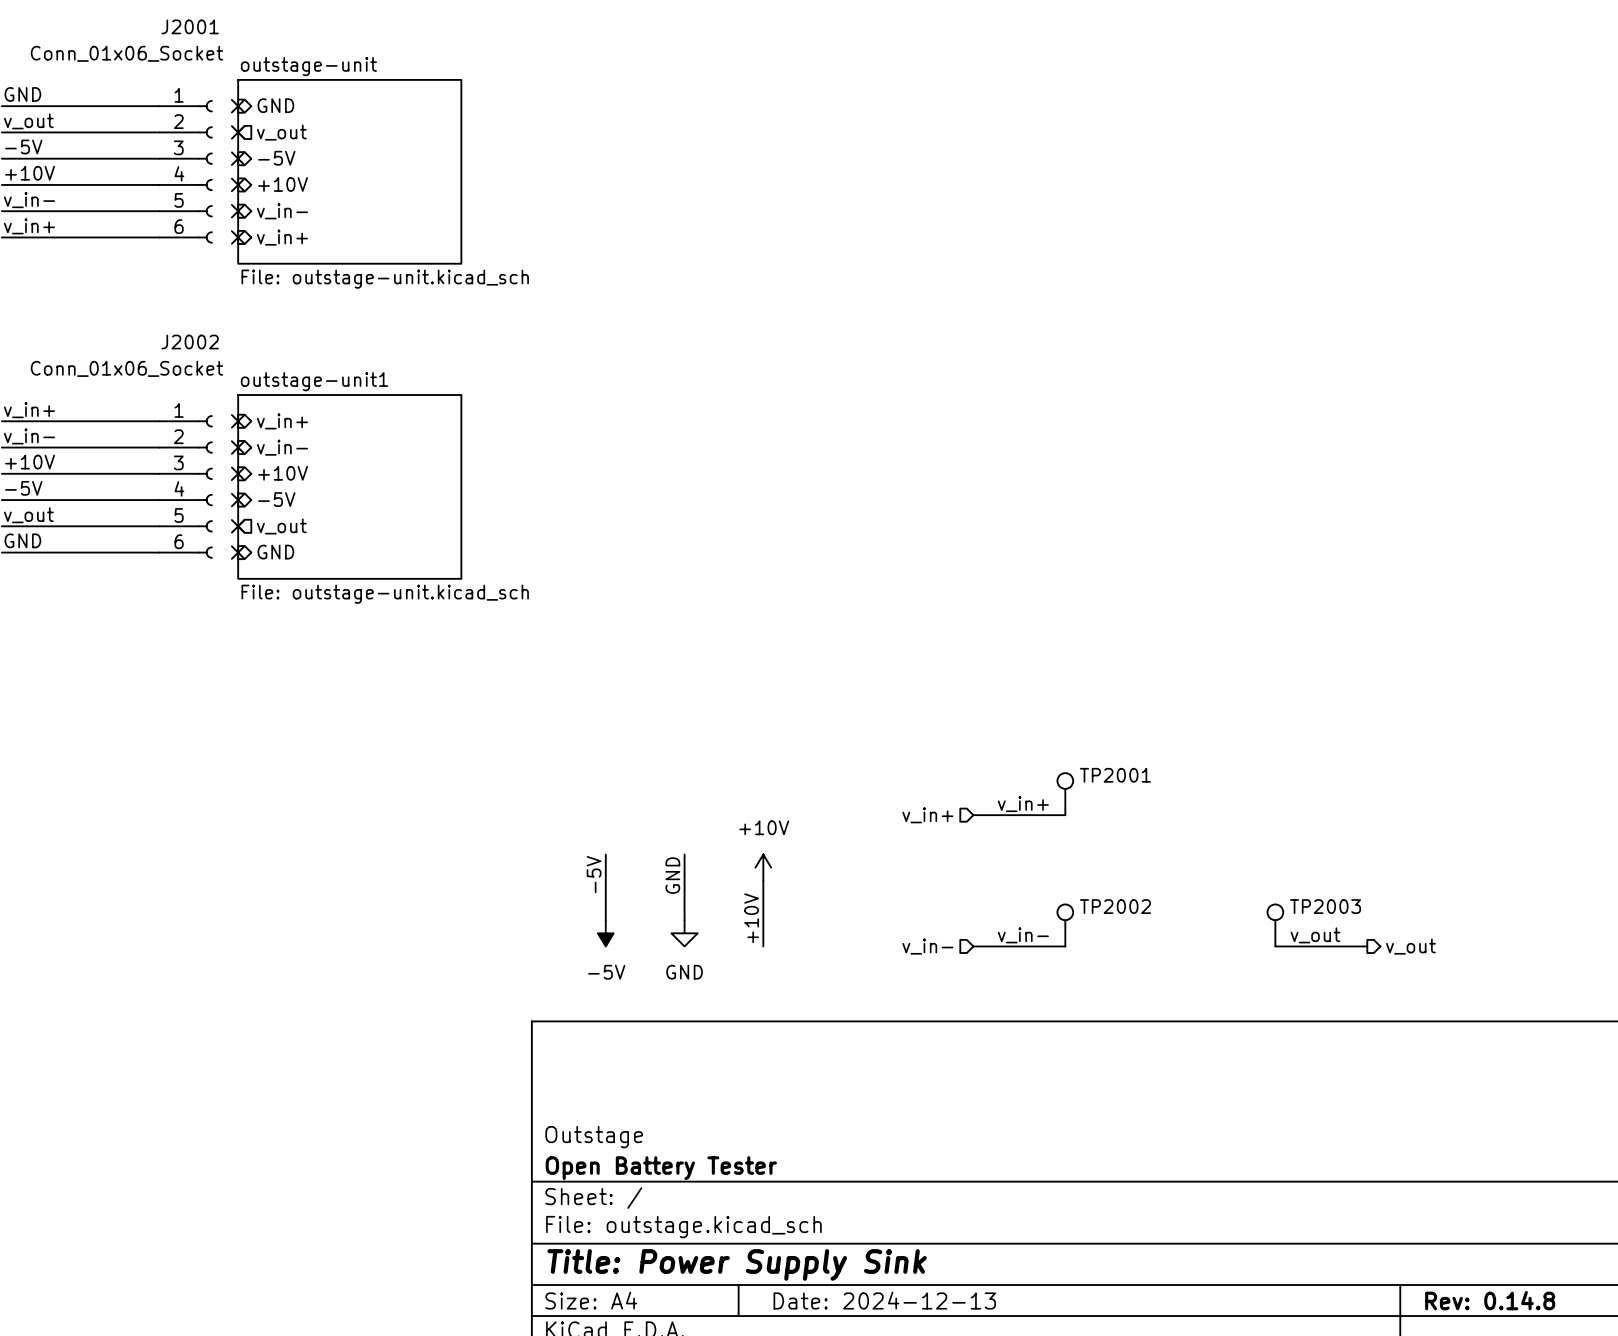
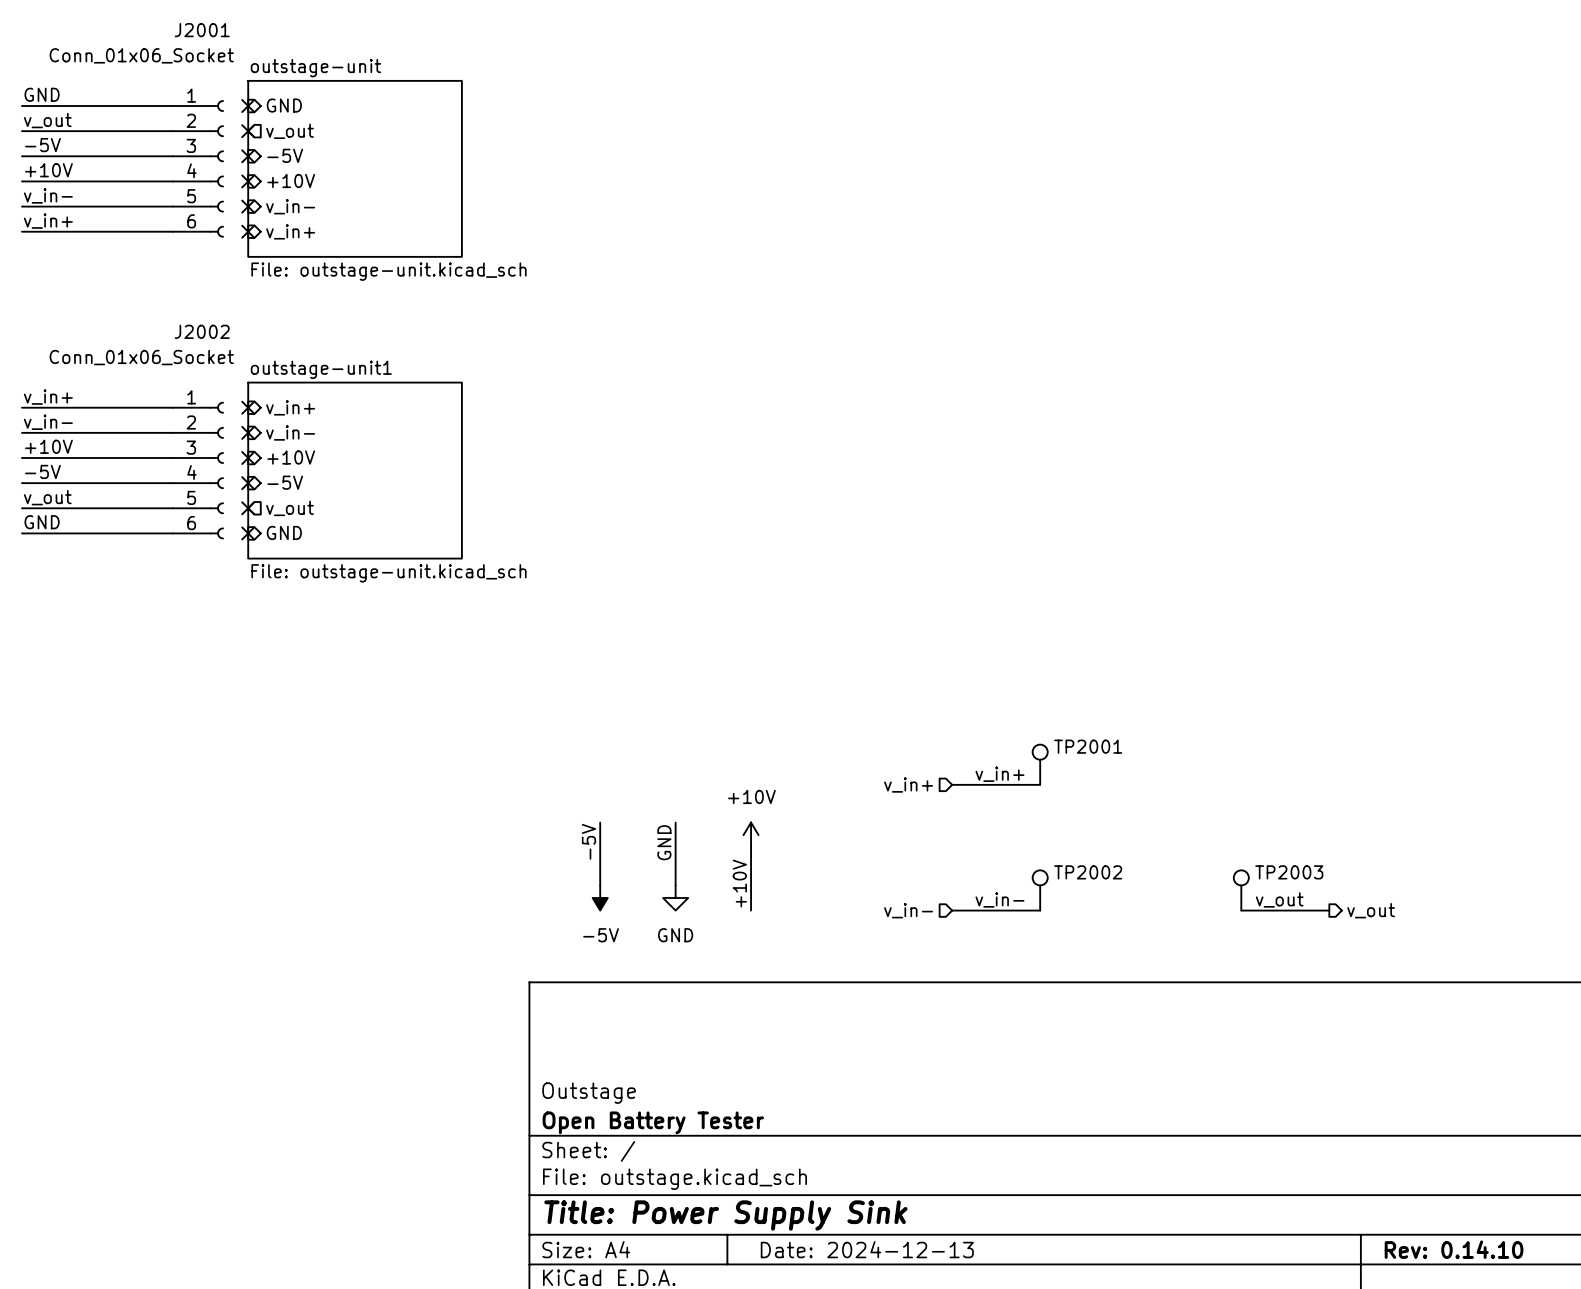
title block: Rev: 0.14.8 (1490, 1300) -> Rev: 0.14.10 (1454, 1249)

